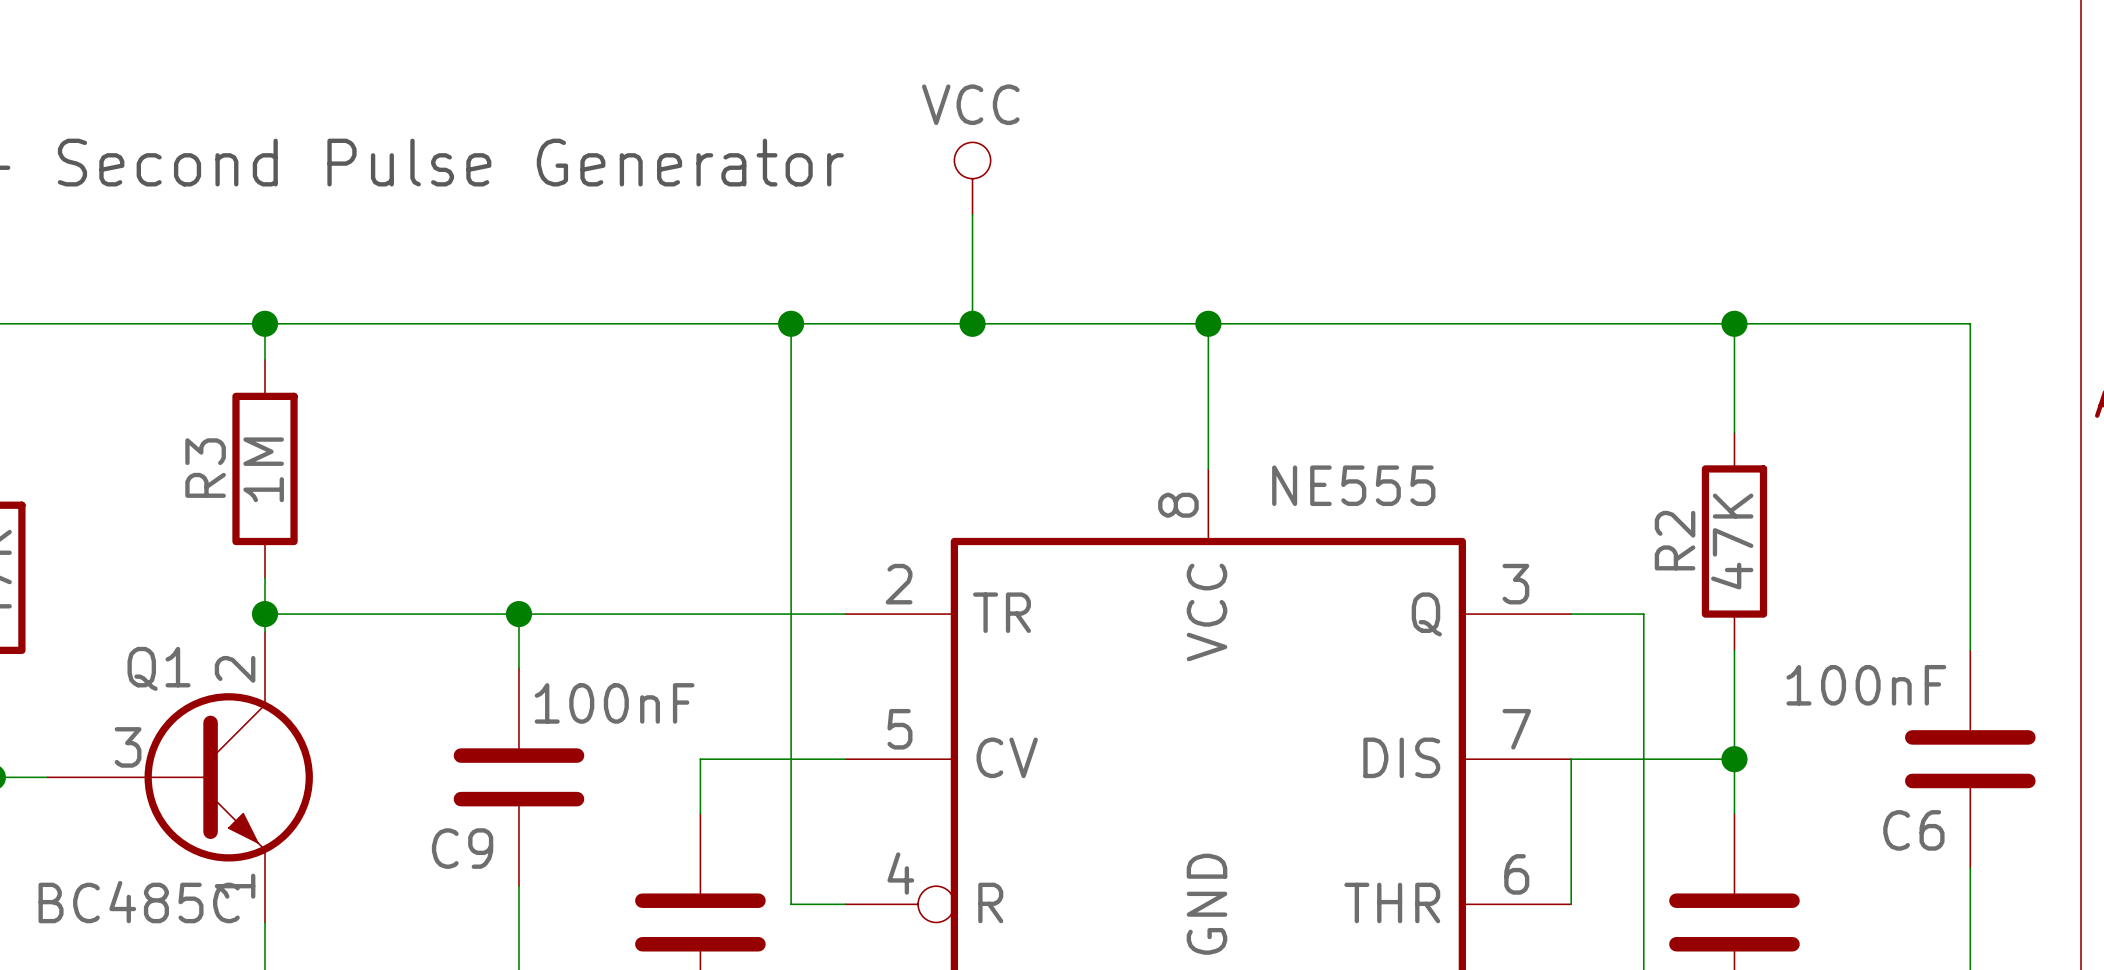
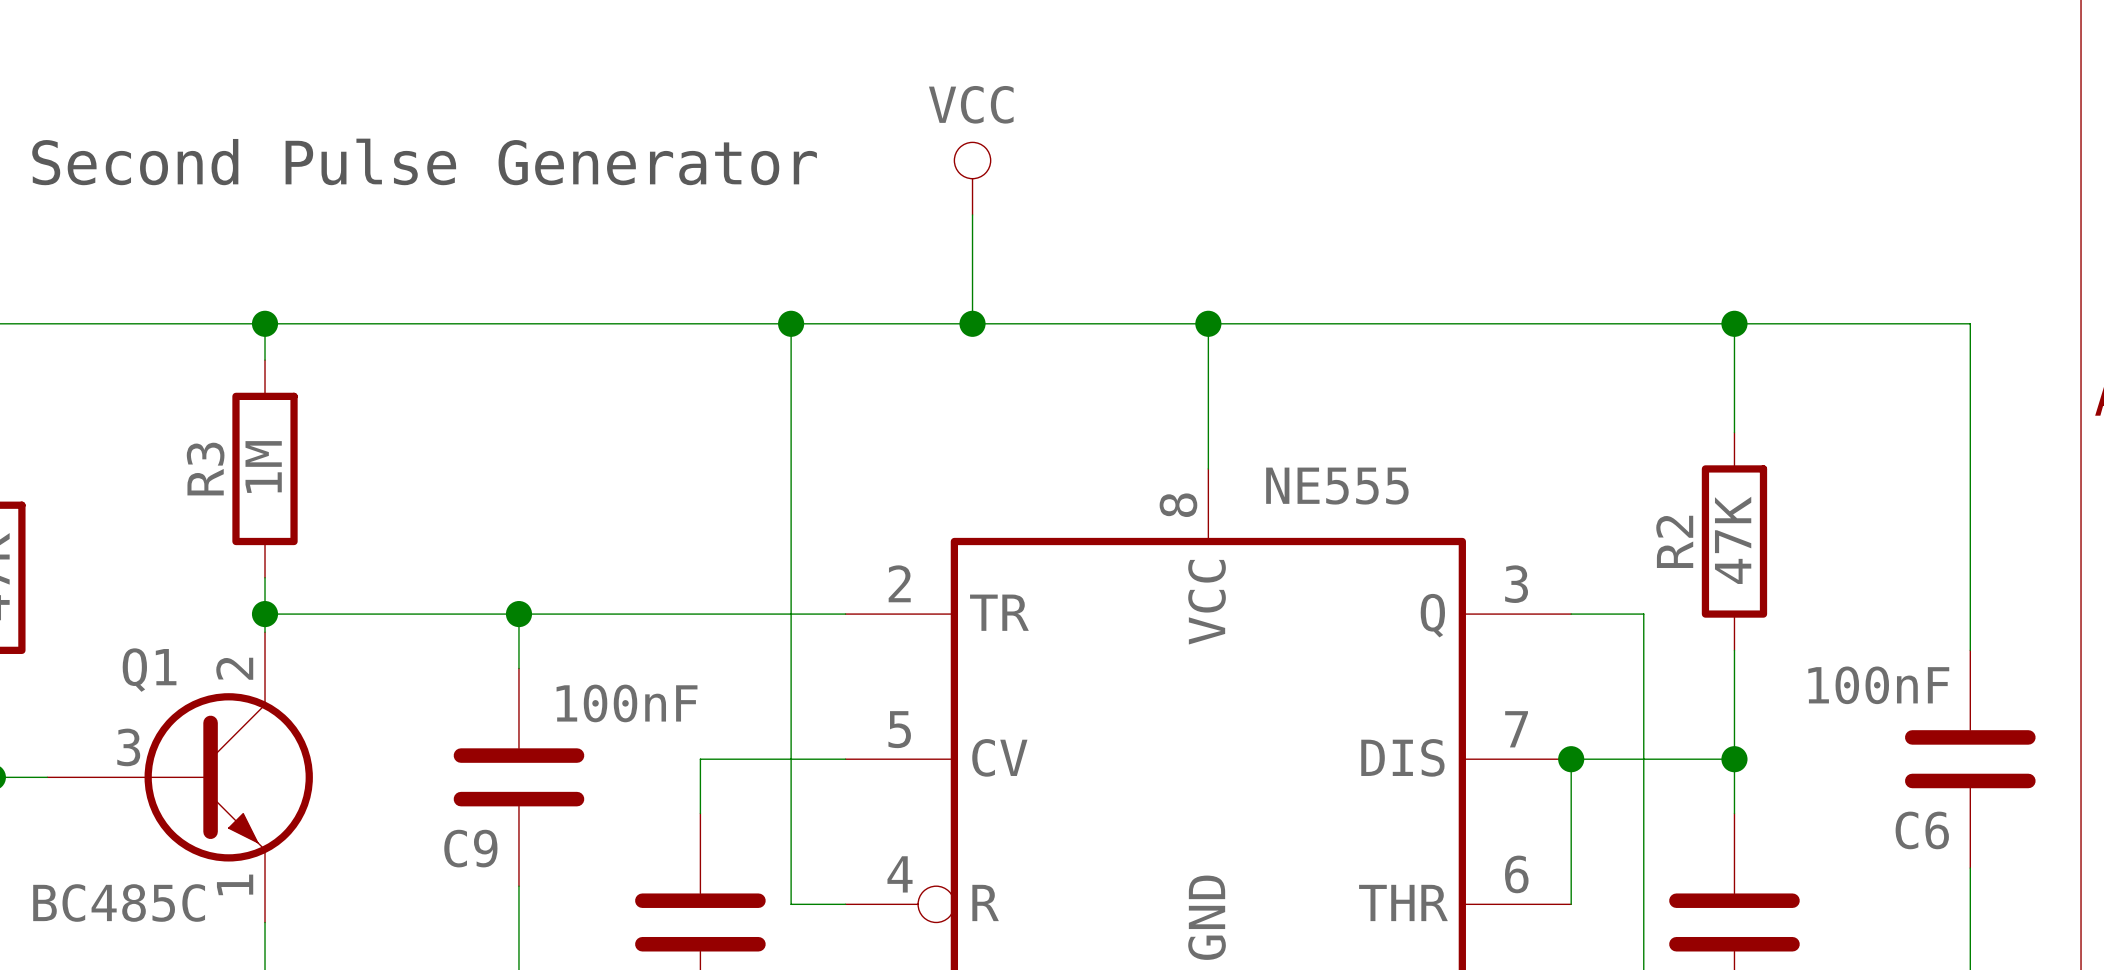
junction: none -> (1571, 759)

